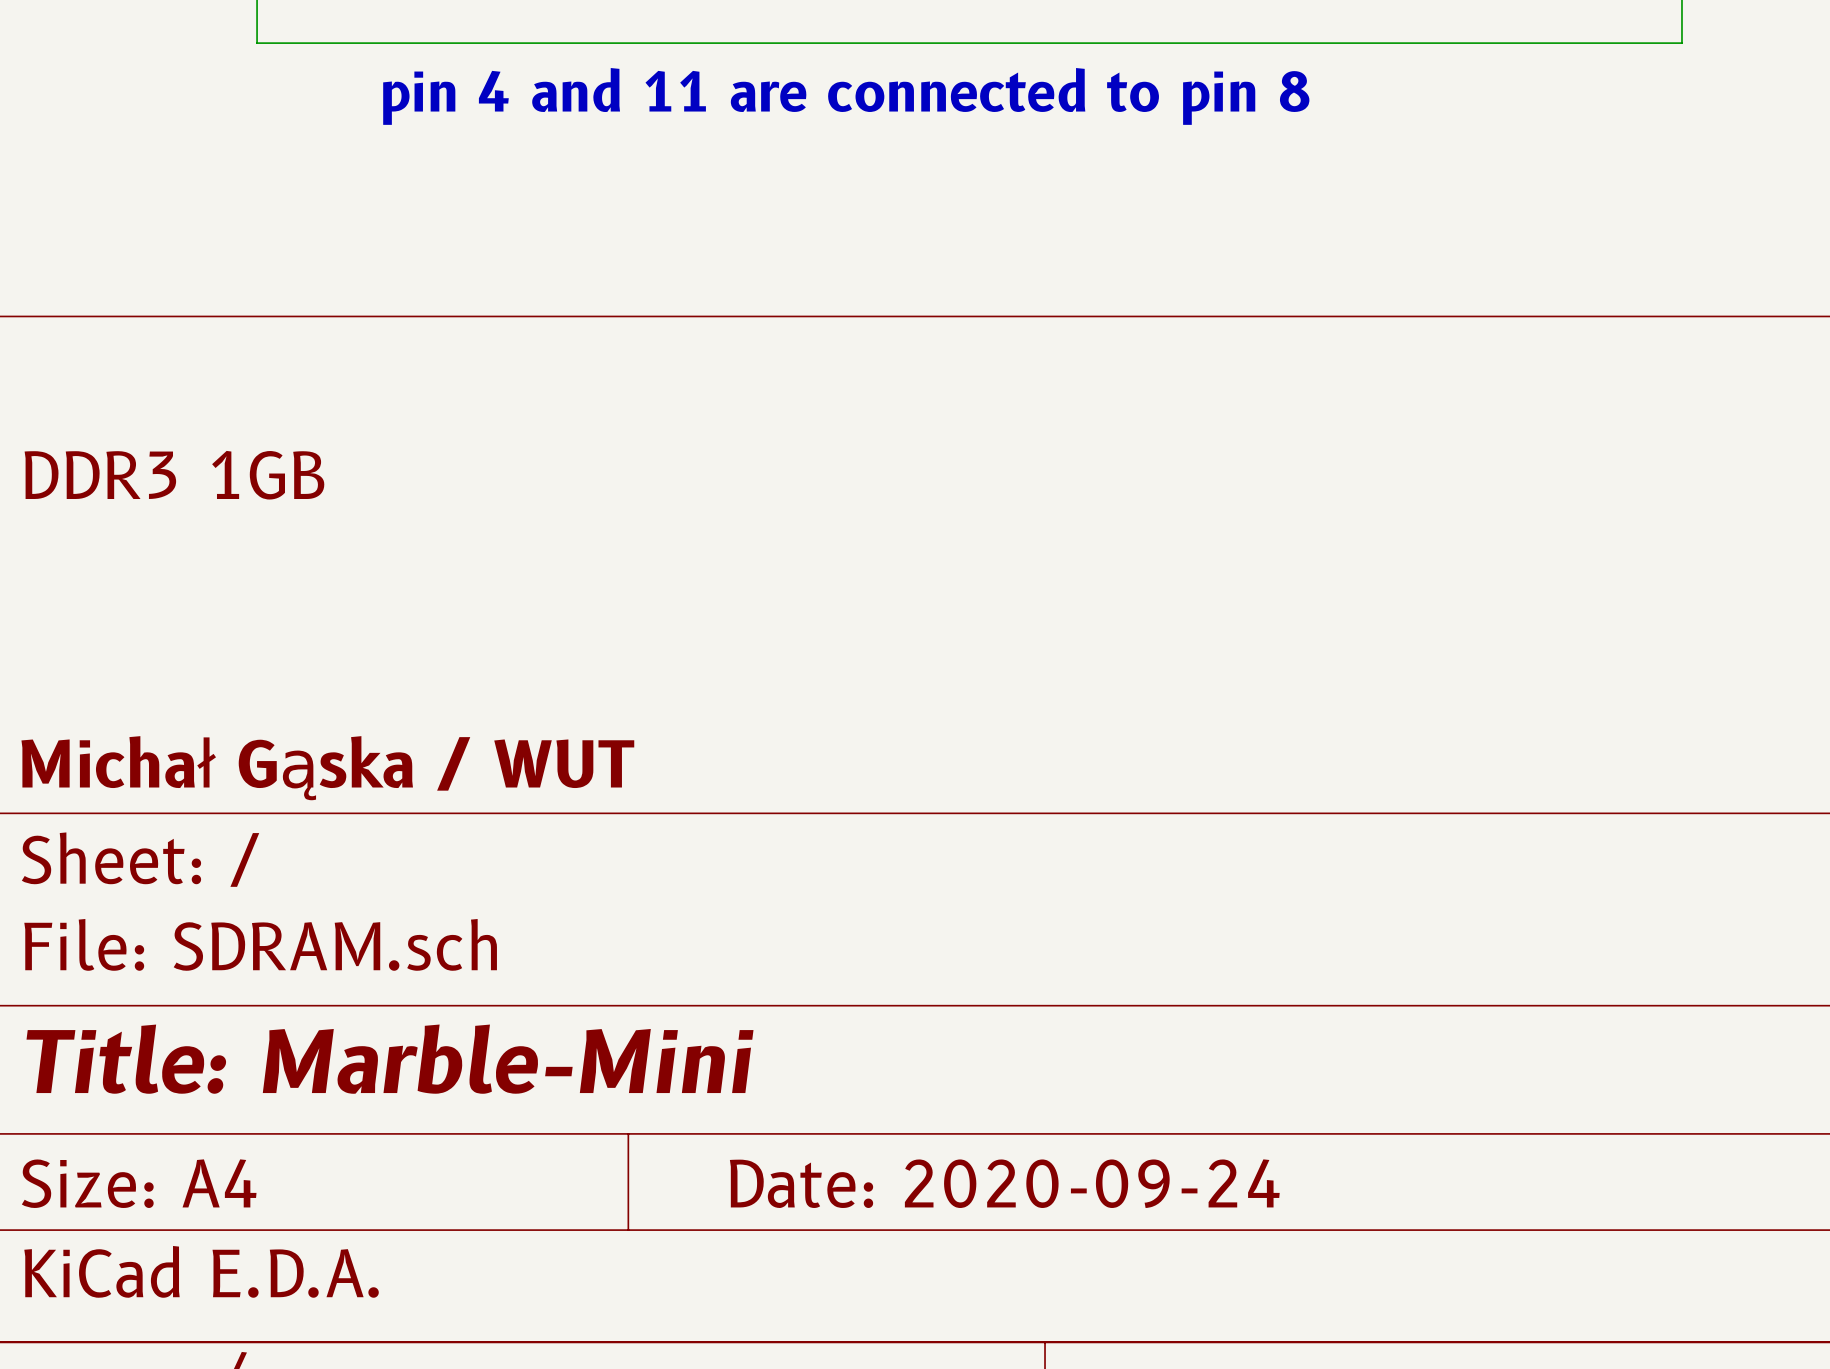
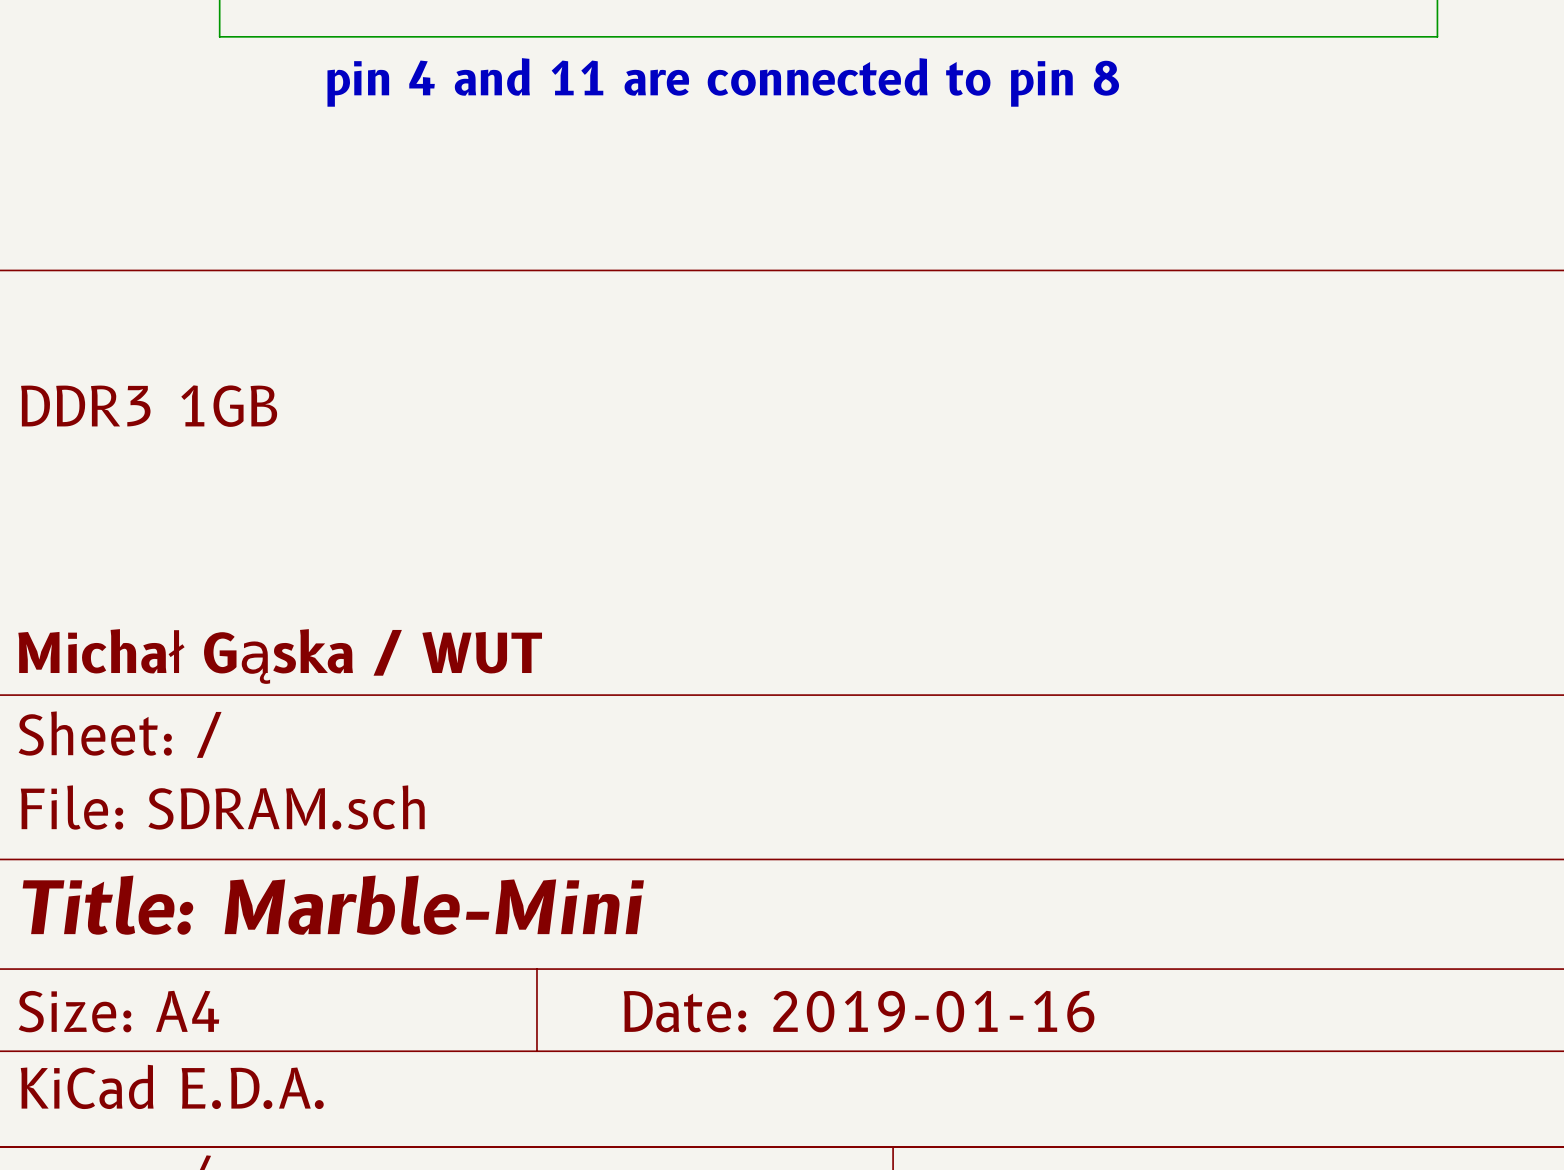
title block: Date: 2020-09-24 (1004, 1183) -> Date: 2019-01-16 (859, 1011)

